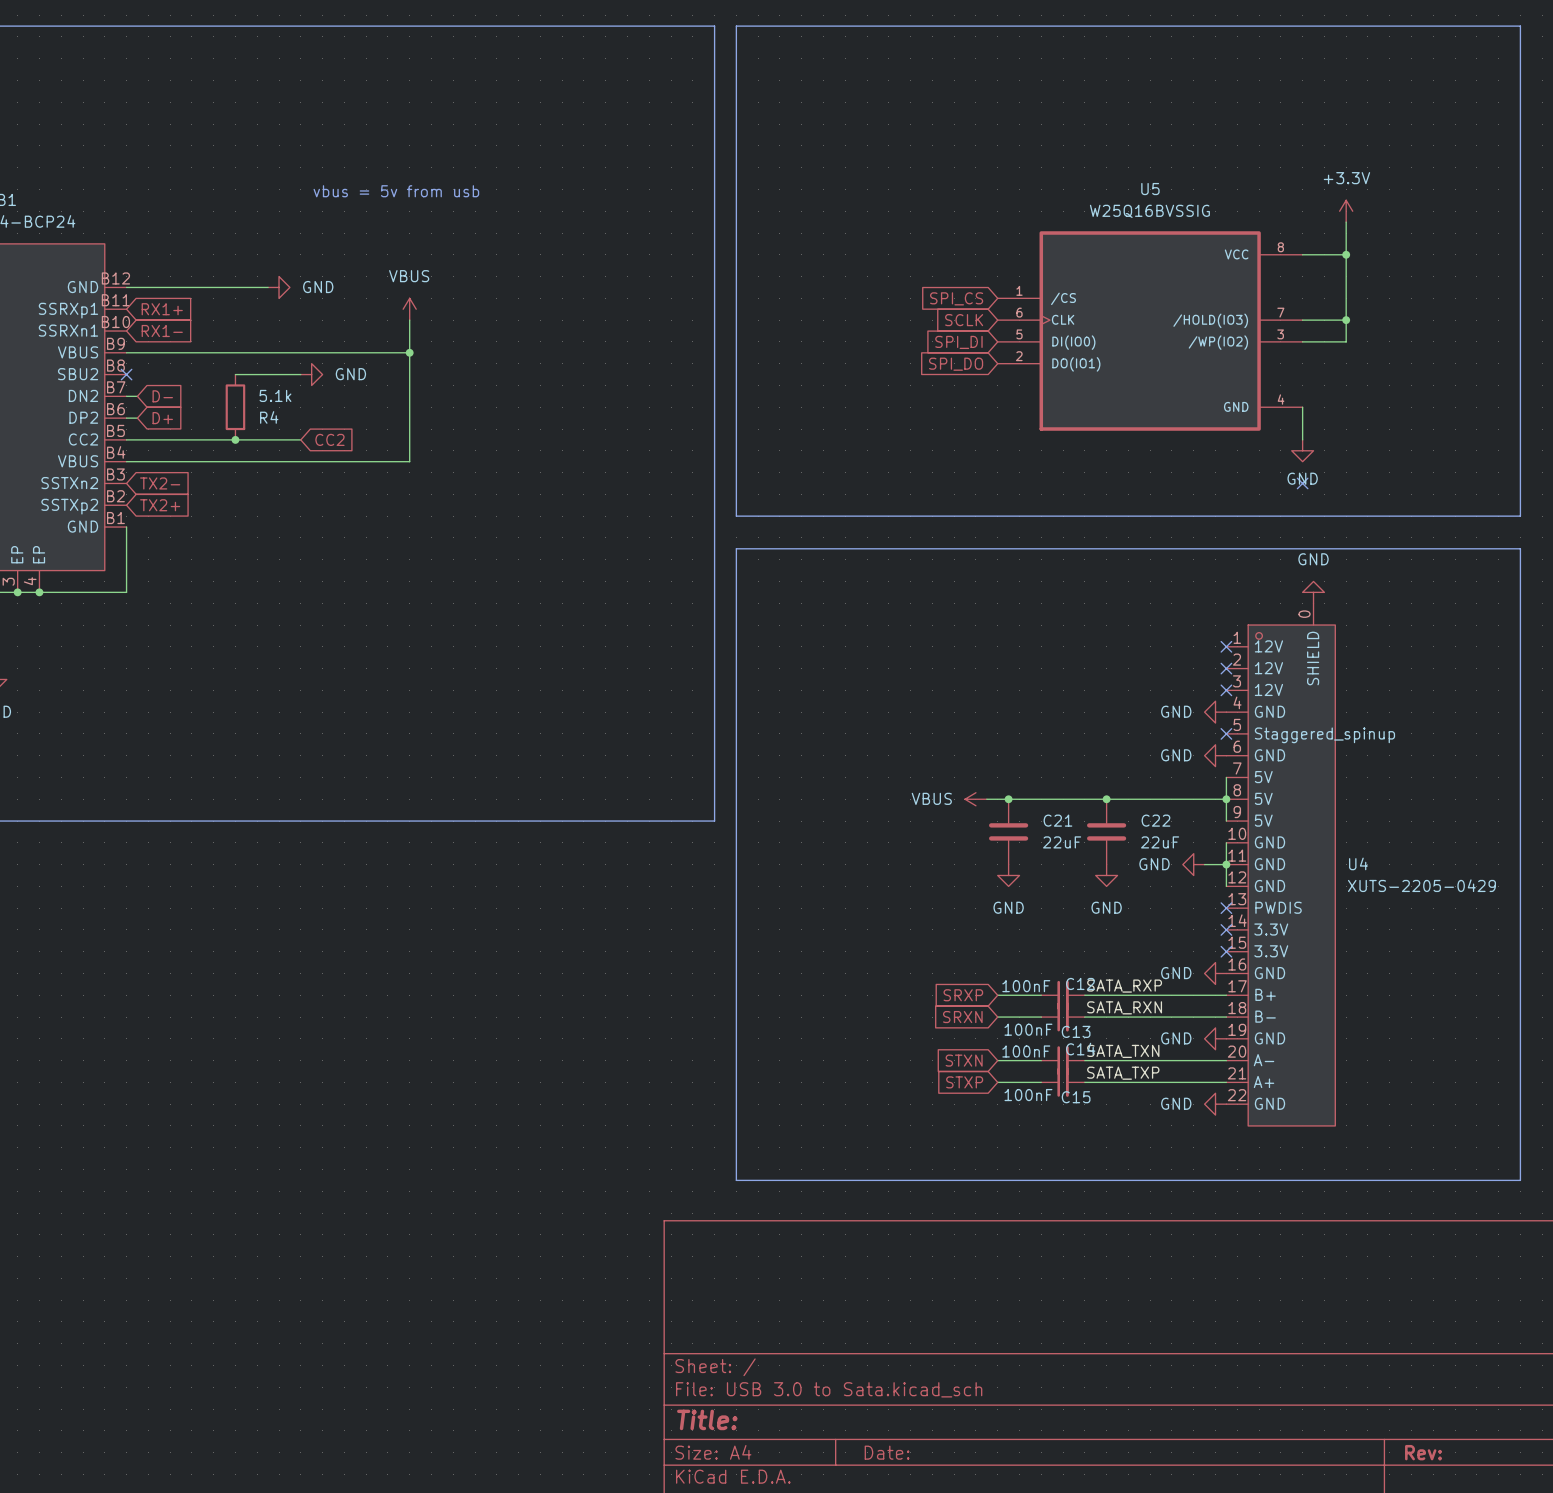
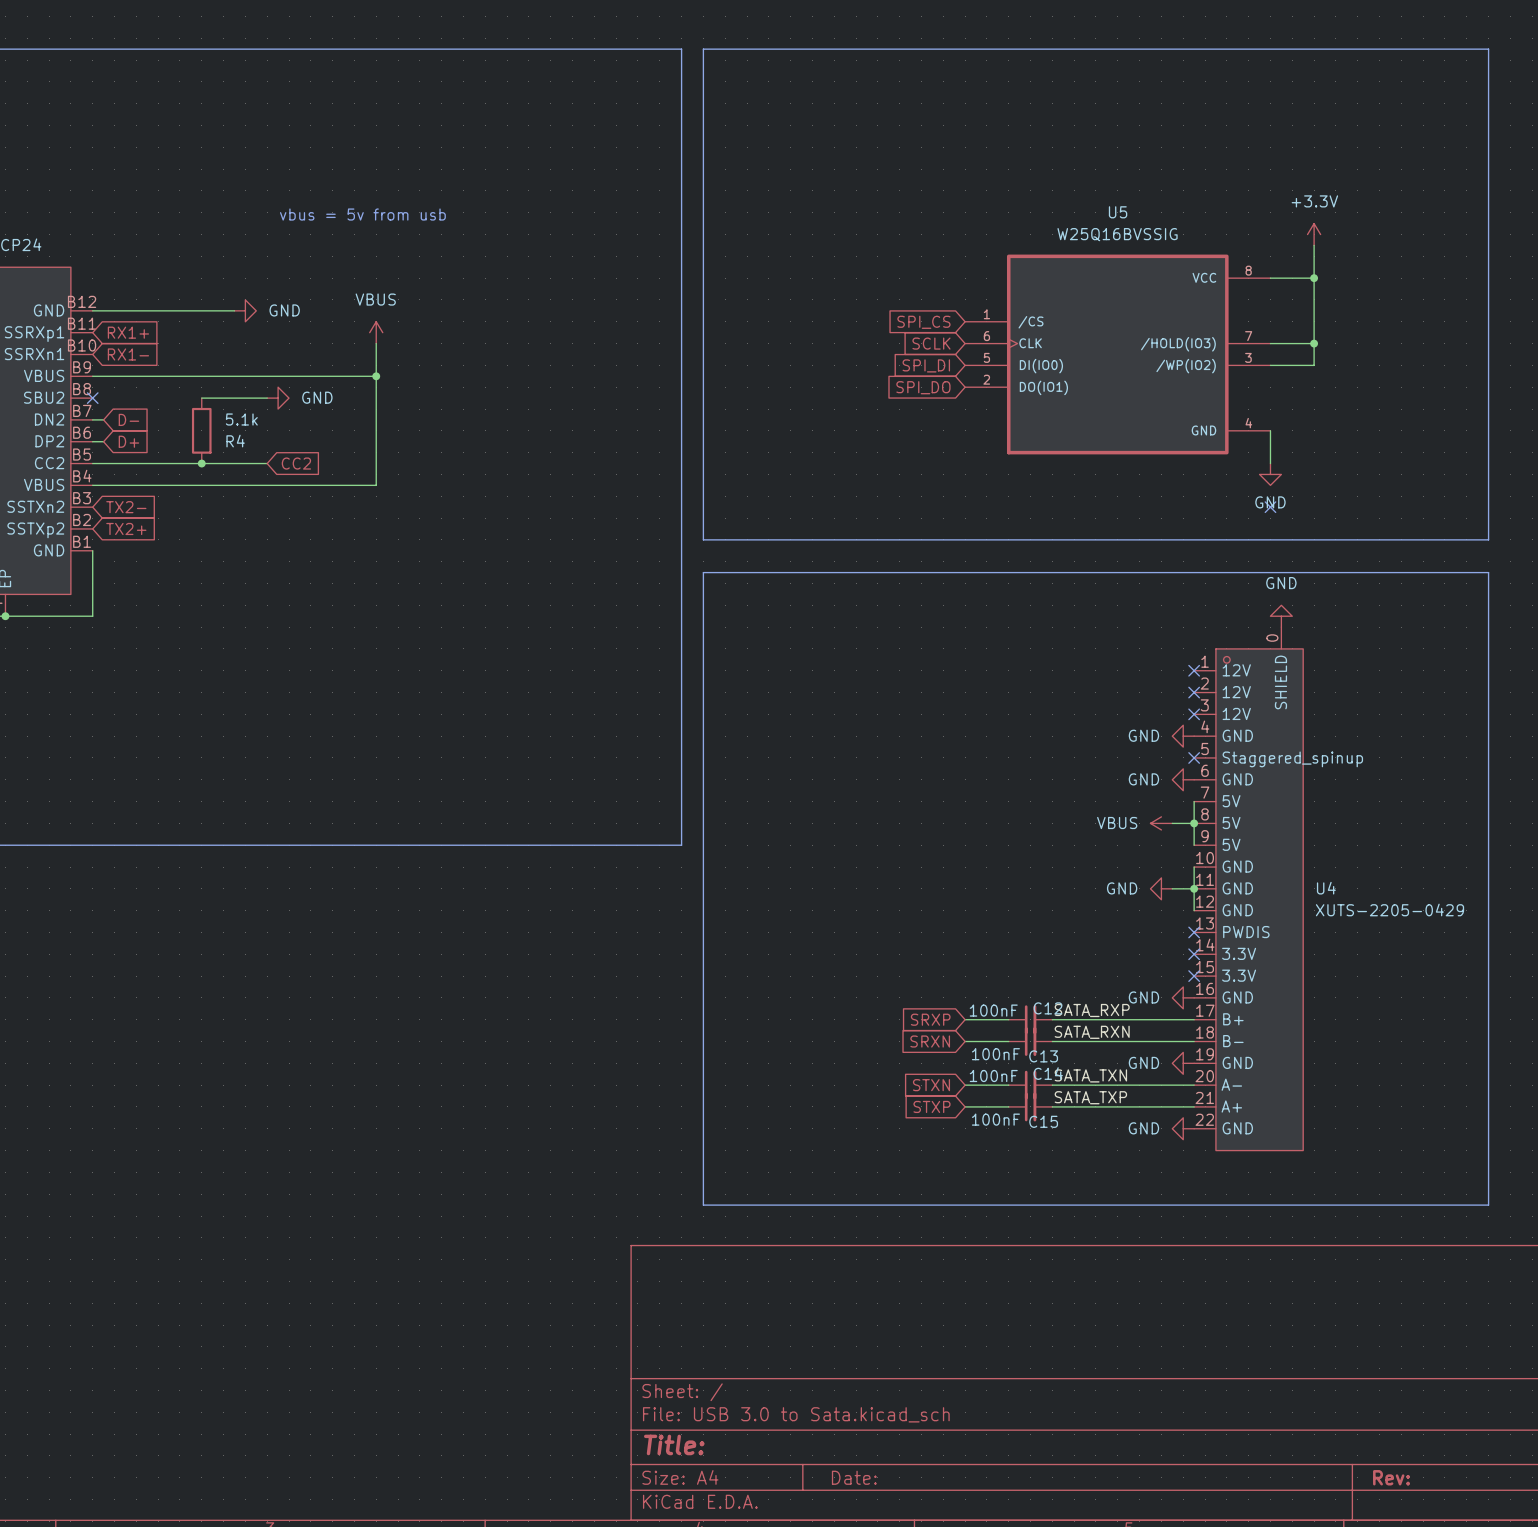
power symbol: VBUS (975, 799) -> none
wire: (986, 799) (1204, 799) -> none
junction: (1008, 799) -> none
junction: (1106, 799) -> none
power symbol: none -> VBUS (1161, 823)
C21: 22uF (1008, 831) -> none
C22: 22uF (1106, 831) -> none
power symbol: GND (1008, 875) -> none
power symbol: GND (1106, 875) -> none

